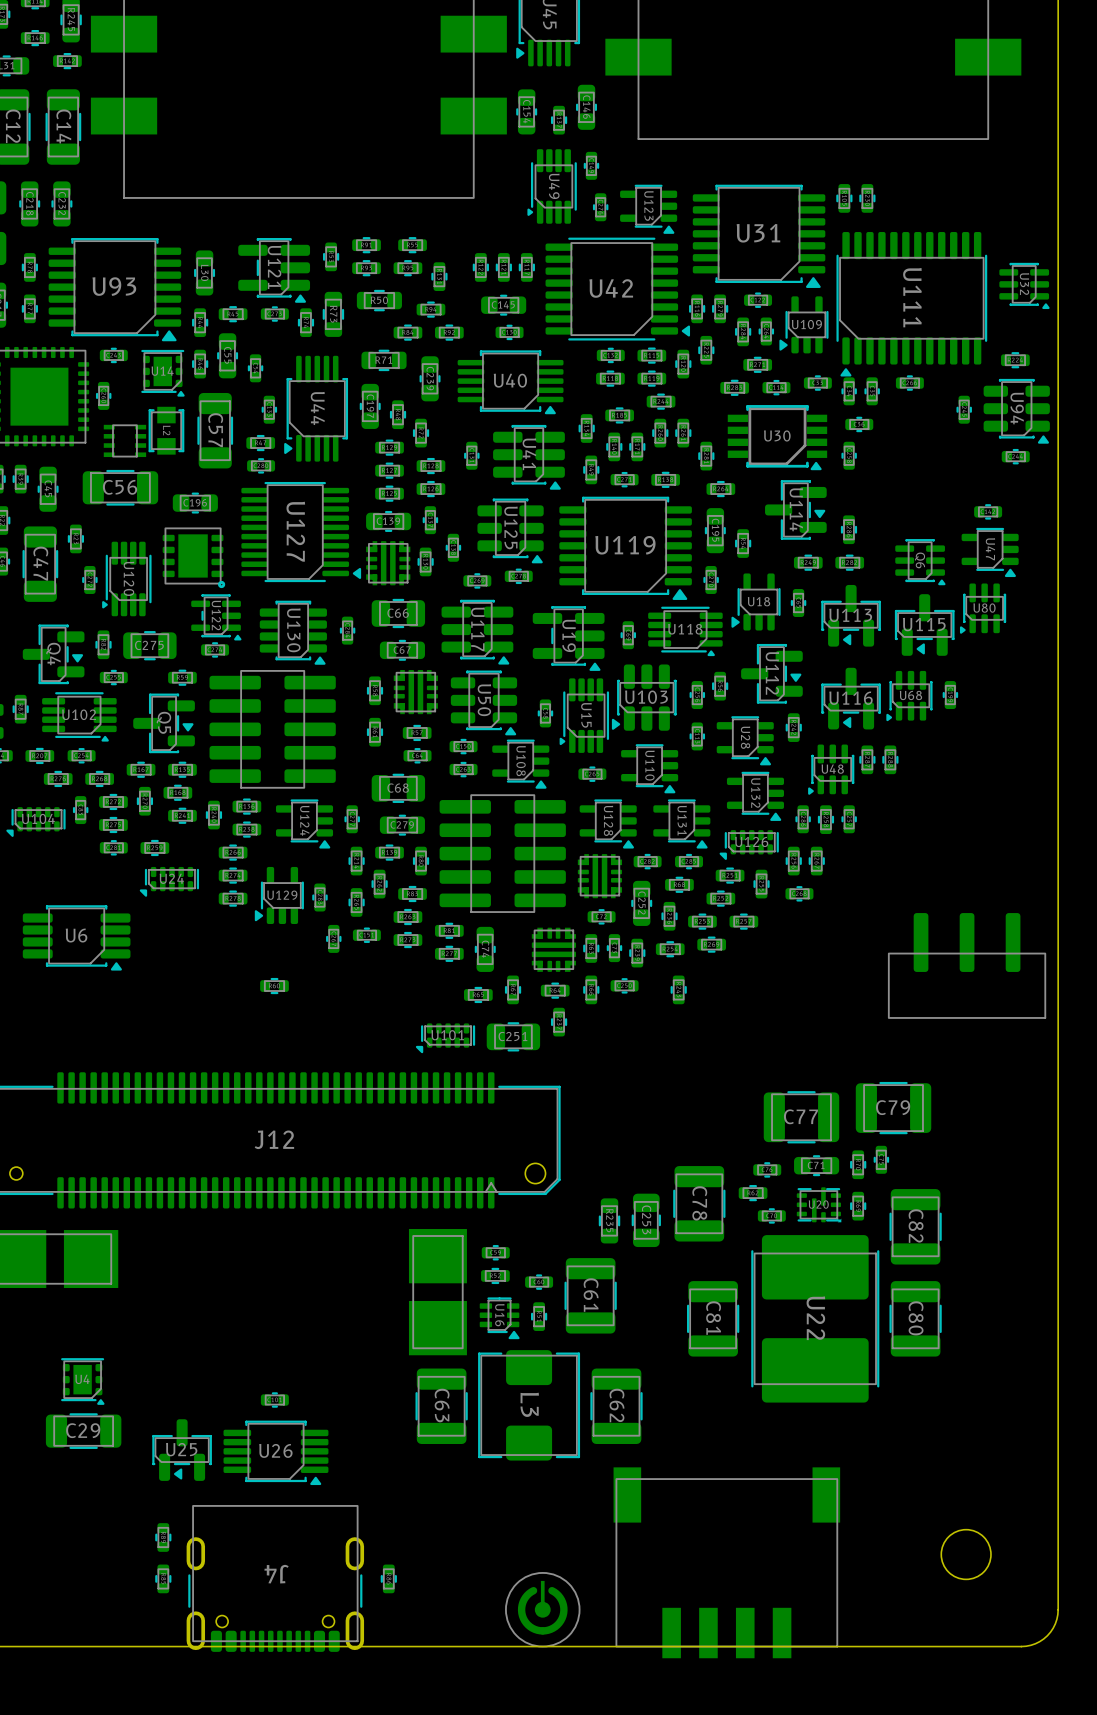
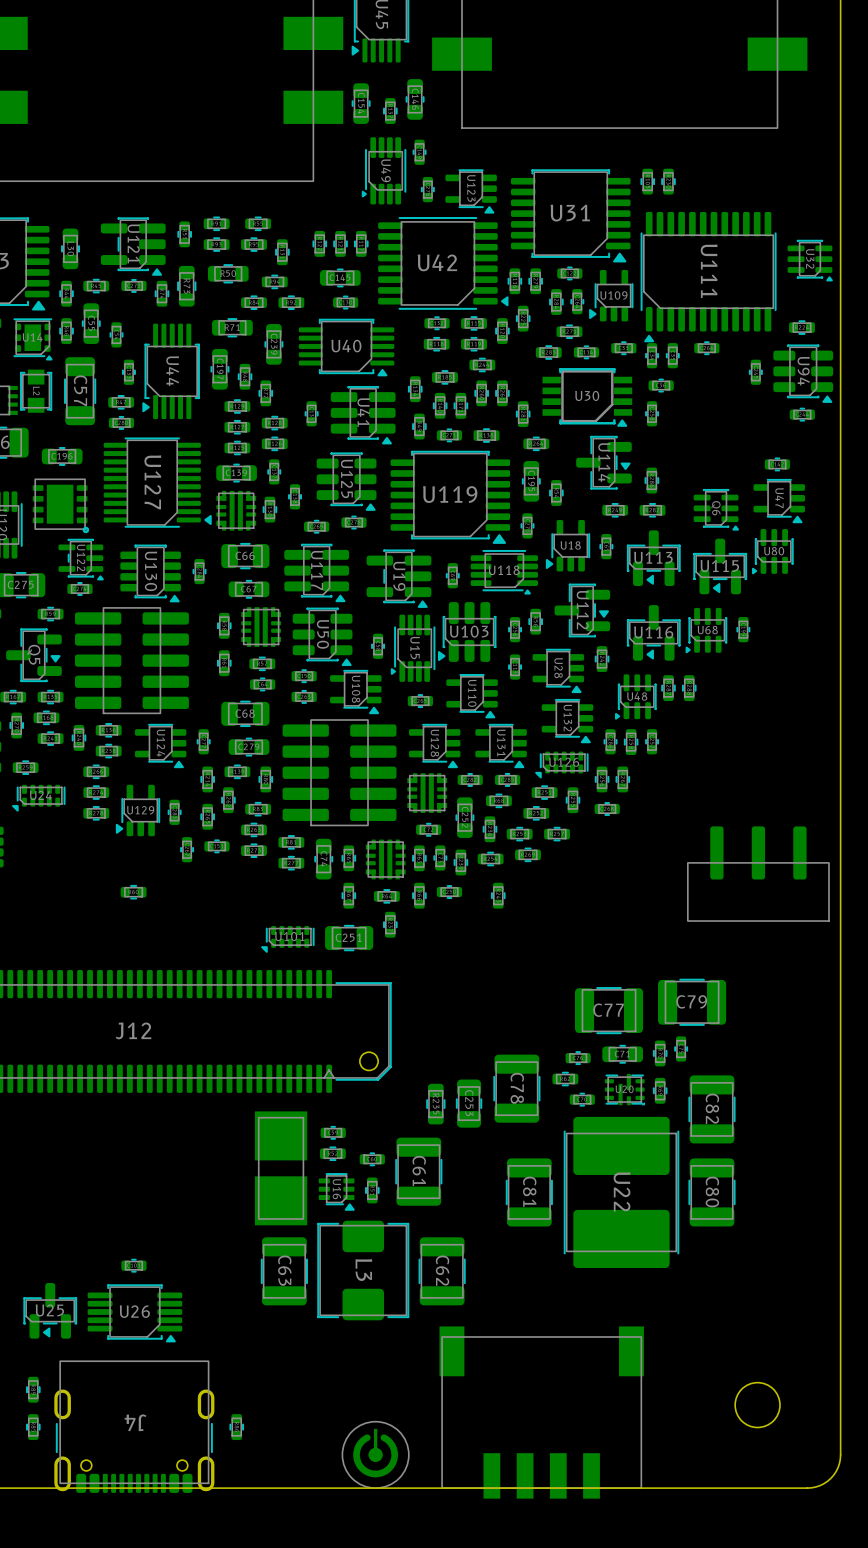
part rotation: 0° (553, 949) -> 90° clockwise (385, 859)
part rotation: 0° (478, 994) -> 90° clockwise (348, 858)
part position: (478, 994) -> (348, 858)

